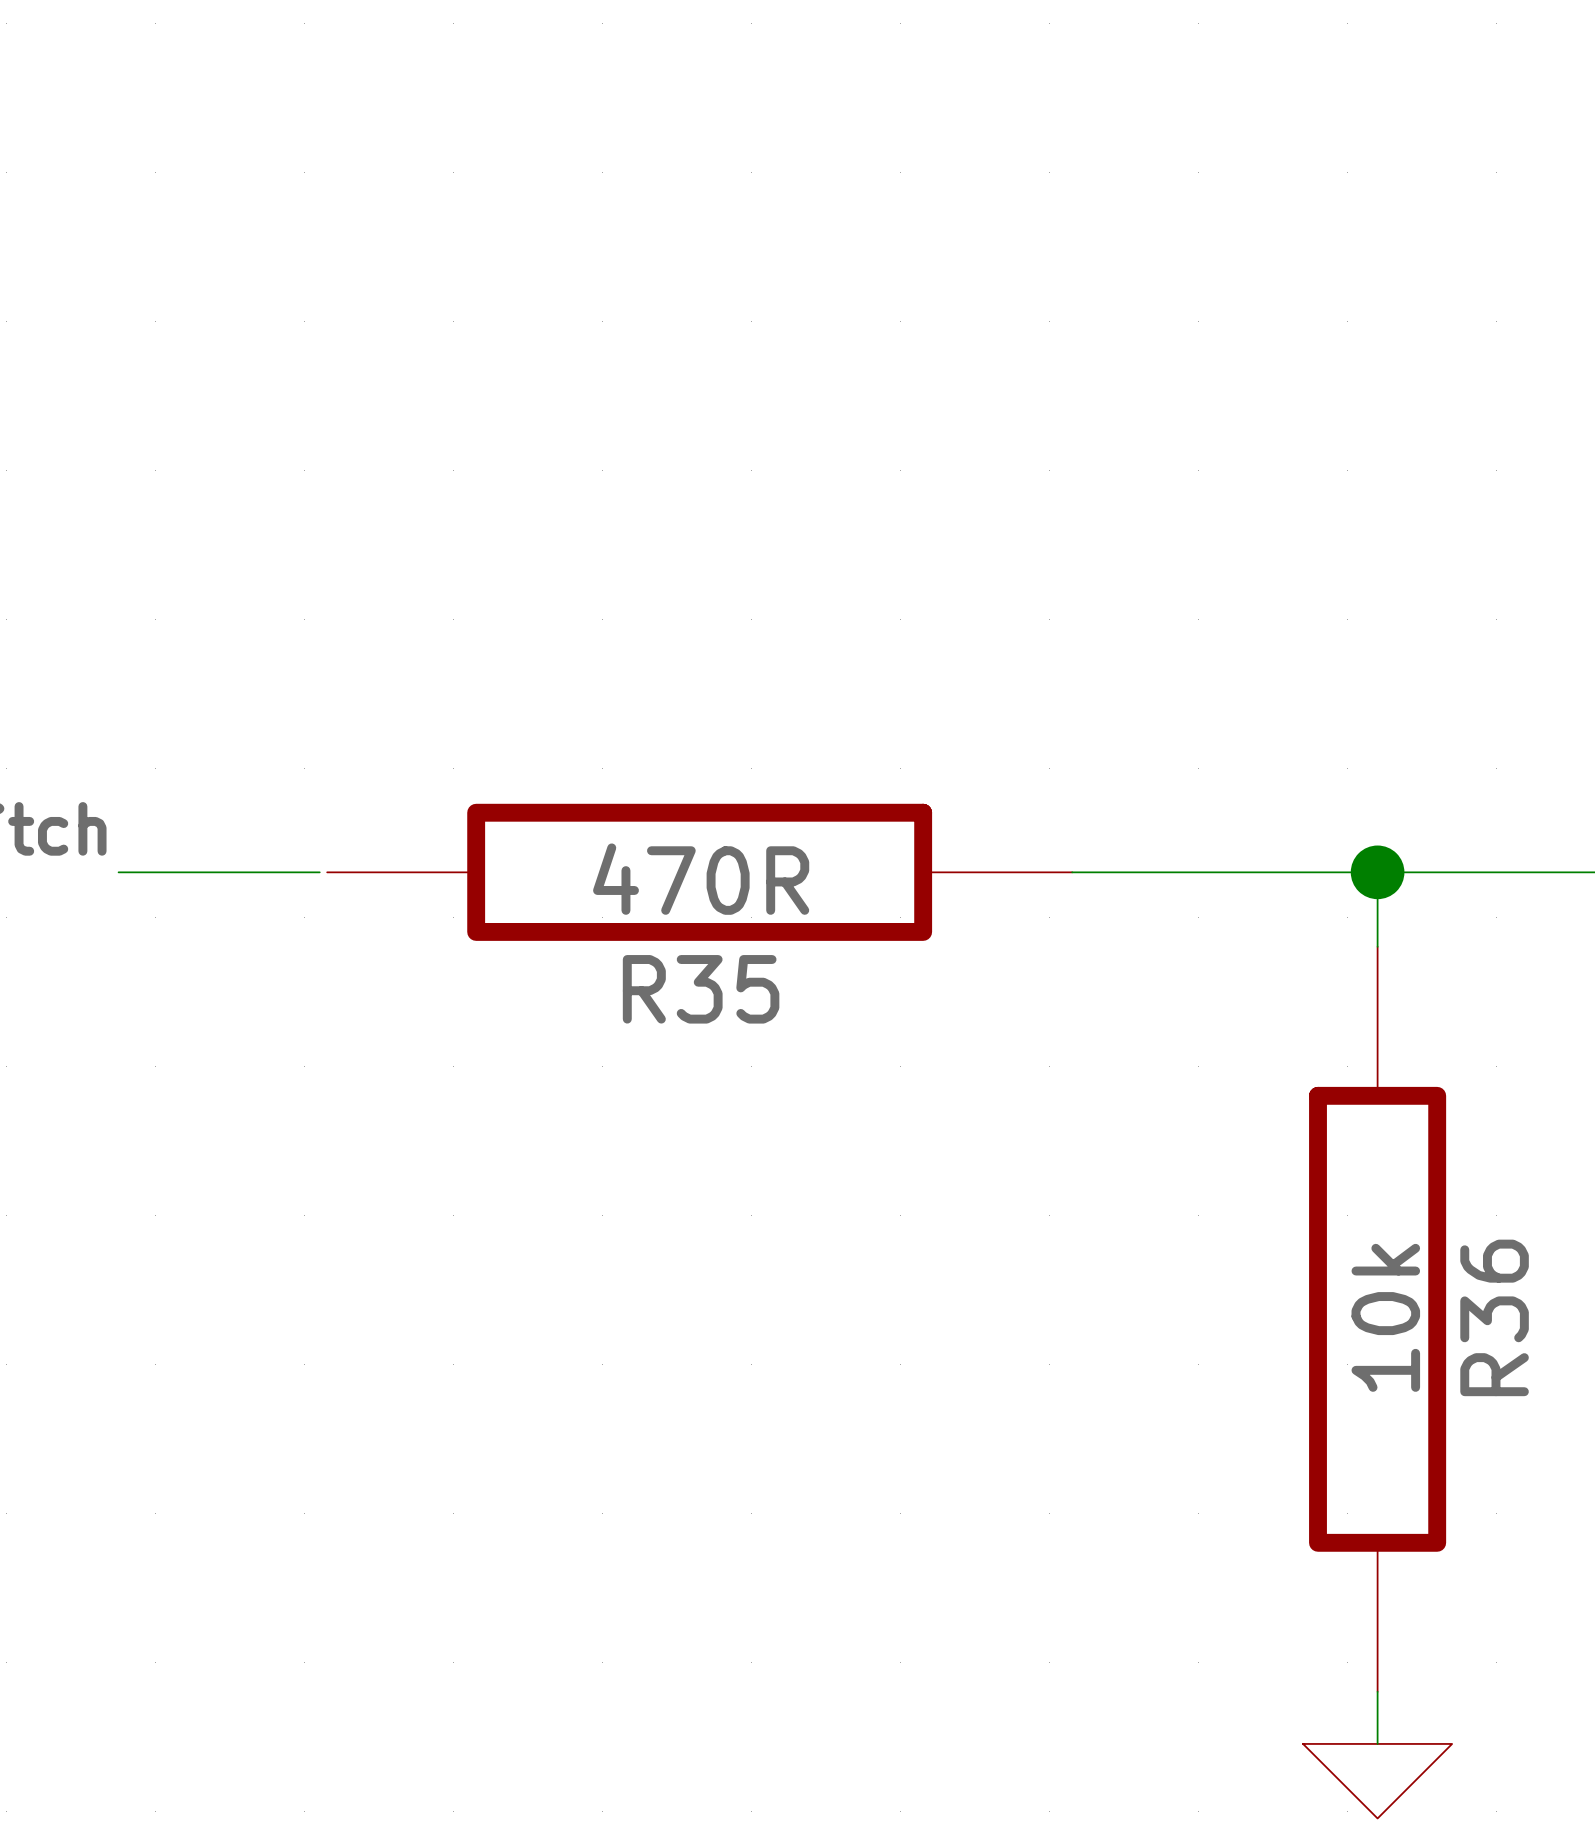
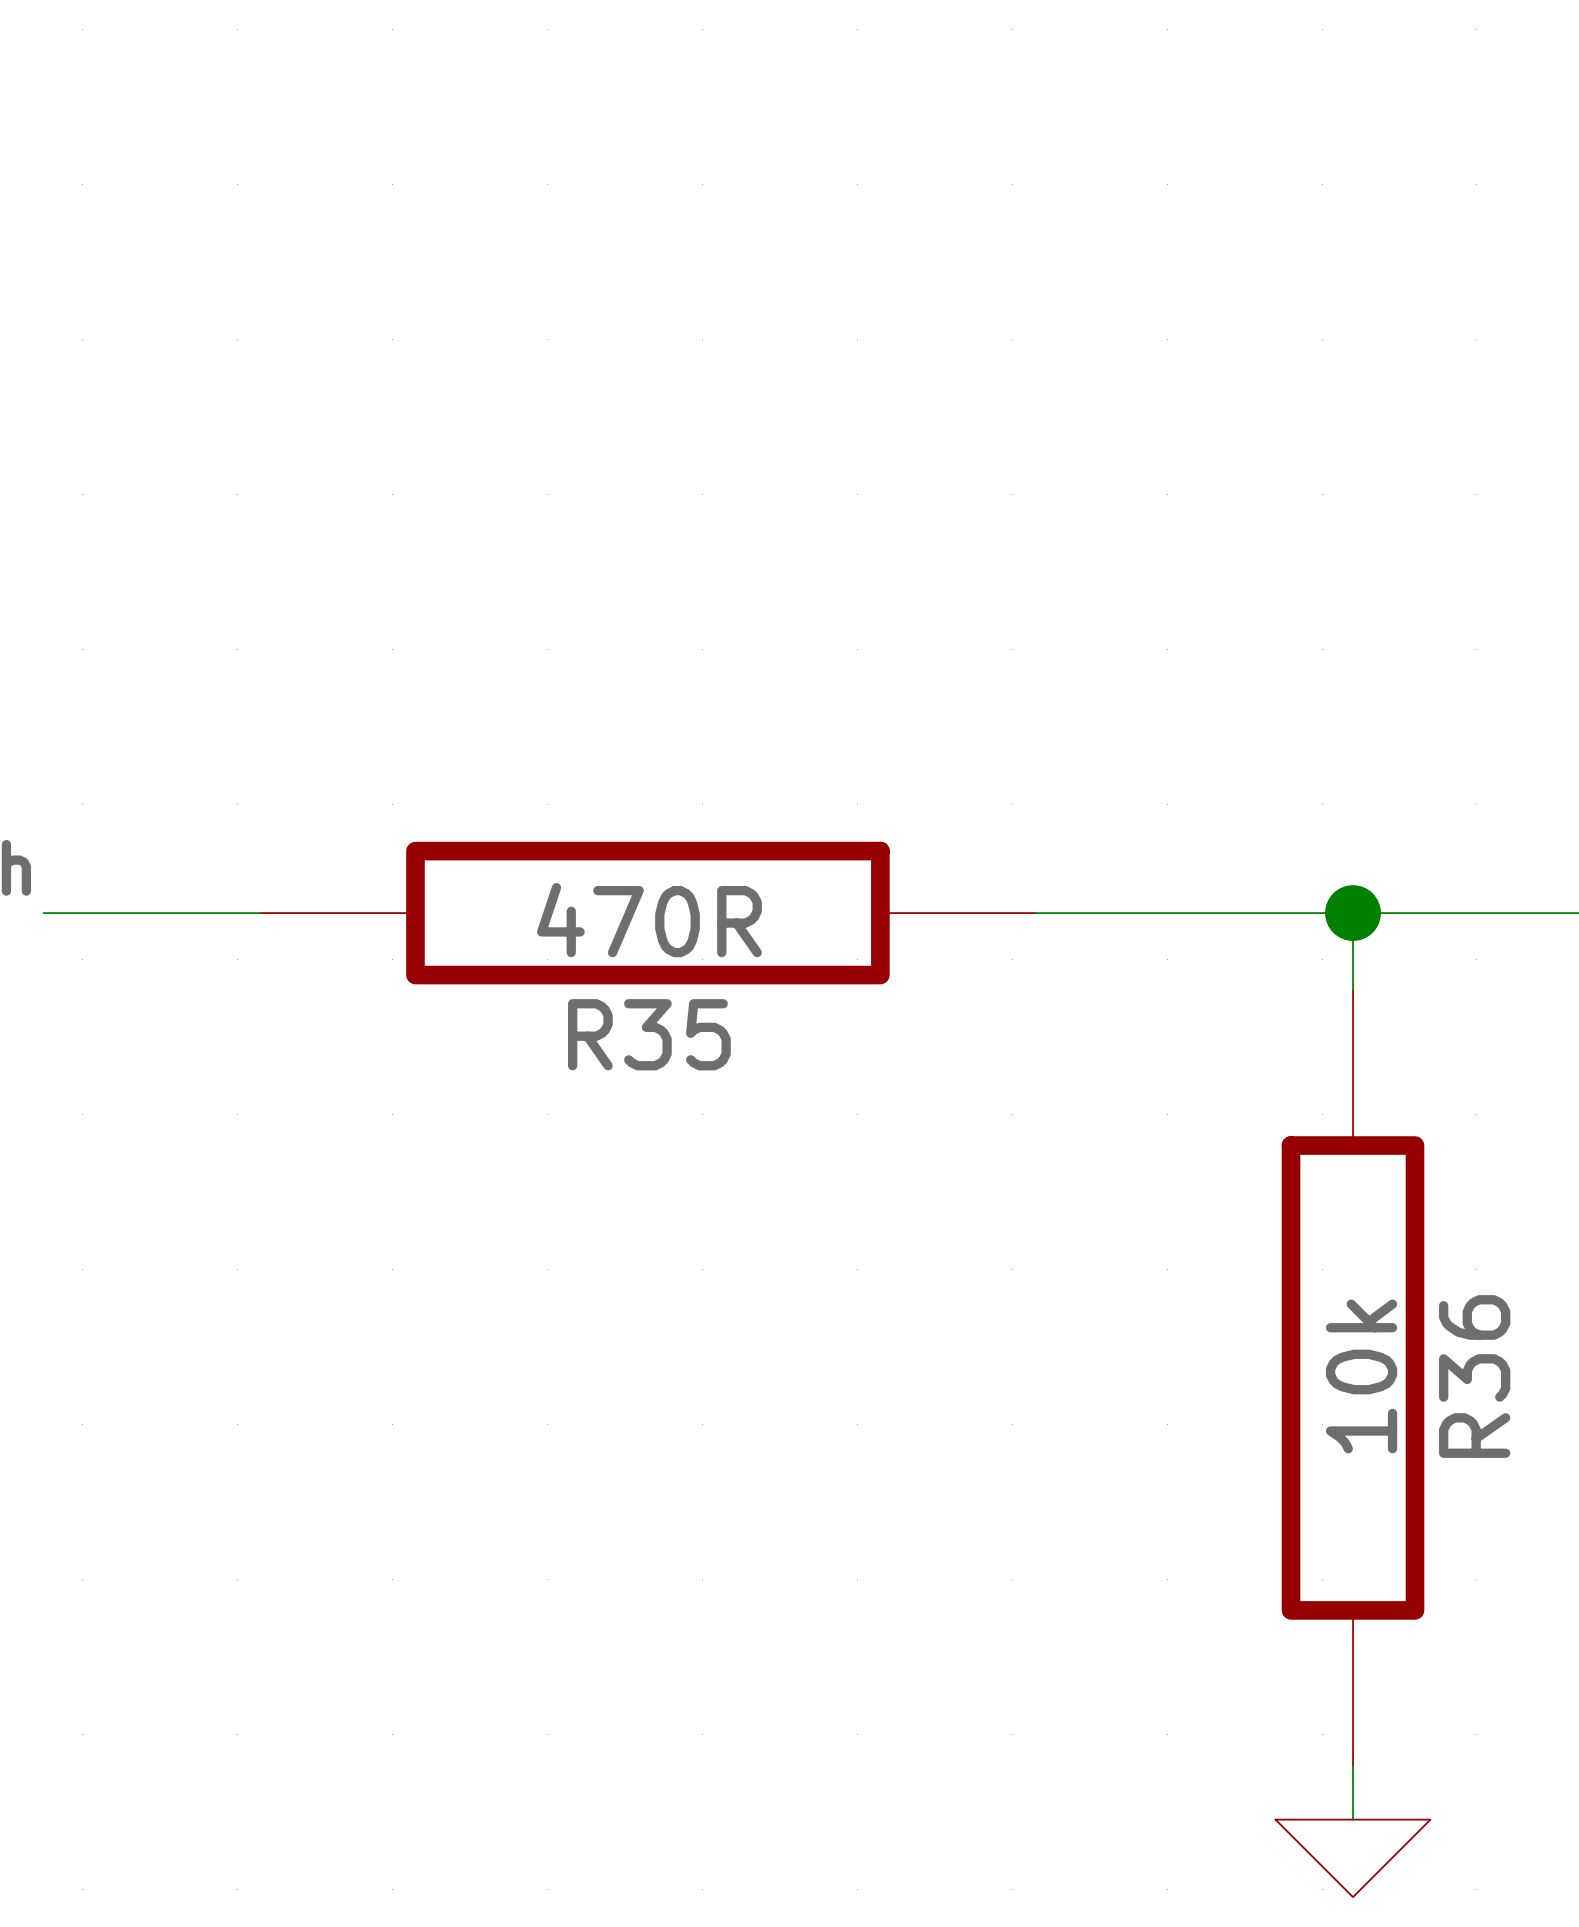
wire: none -> (252, 913) (260, 913)

